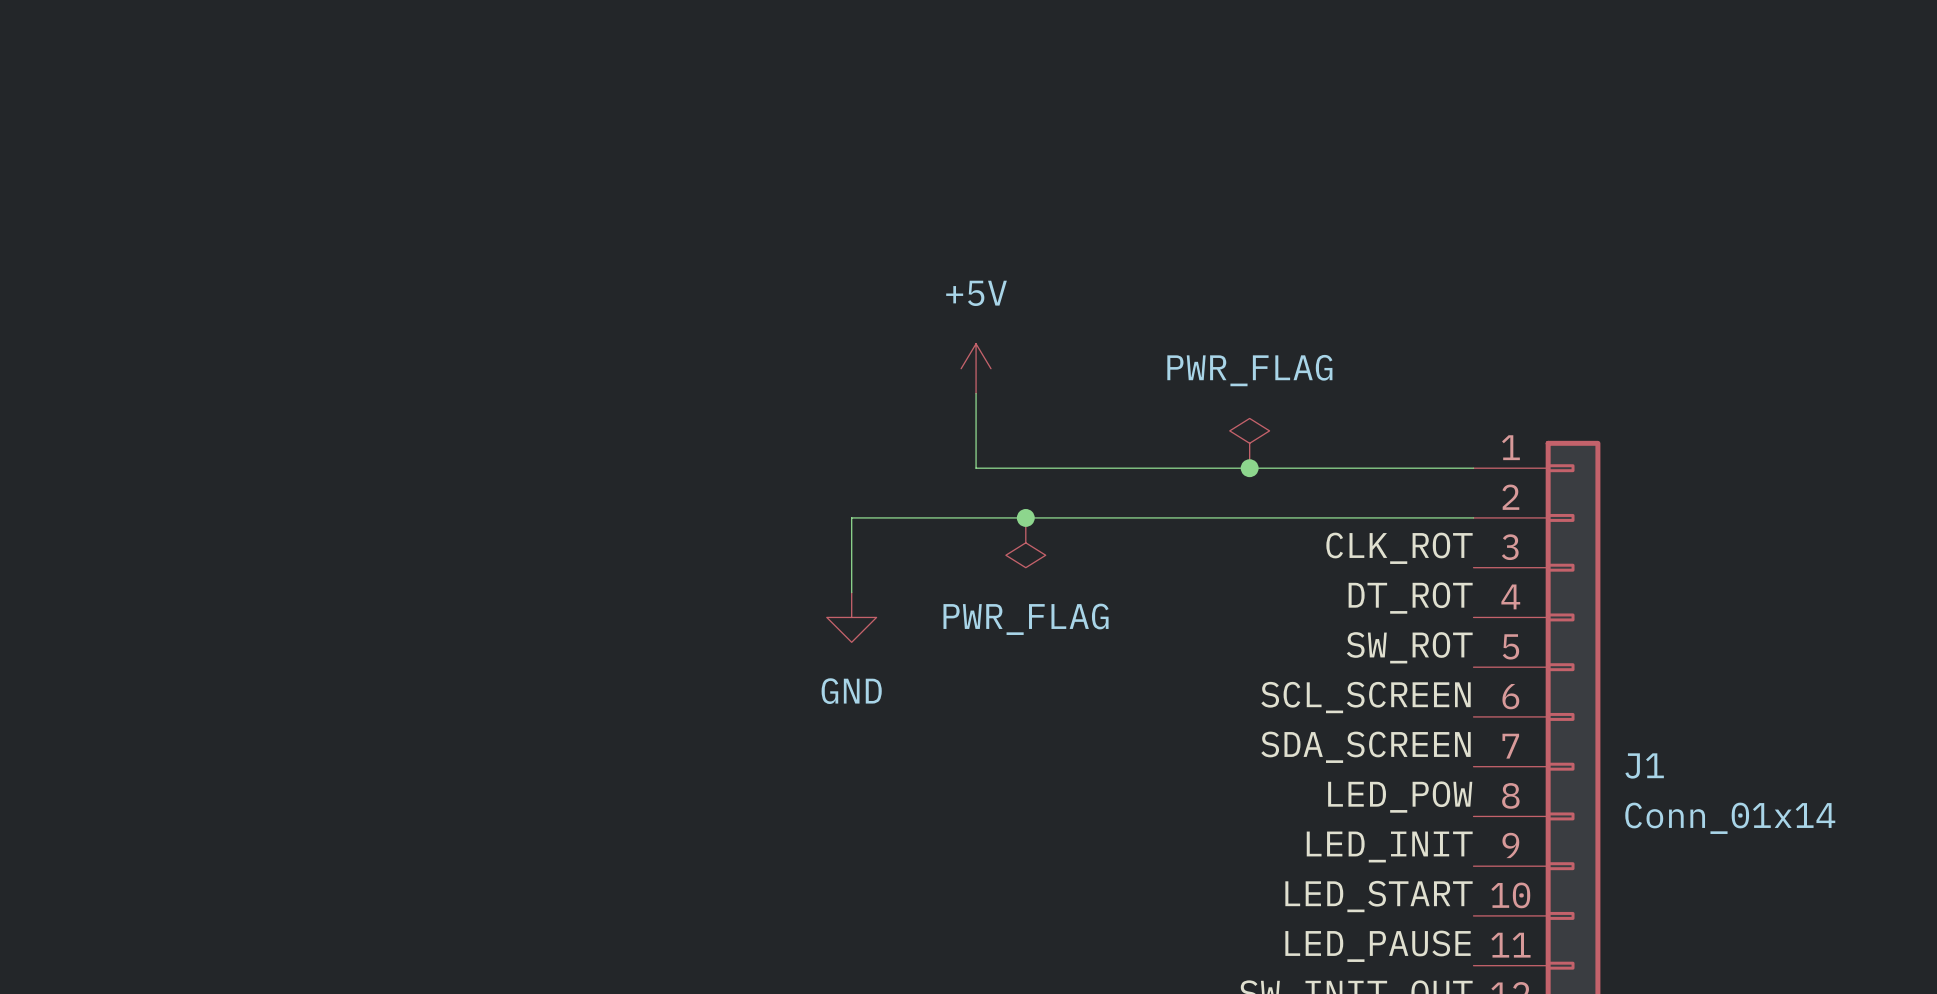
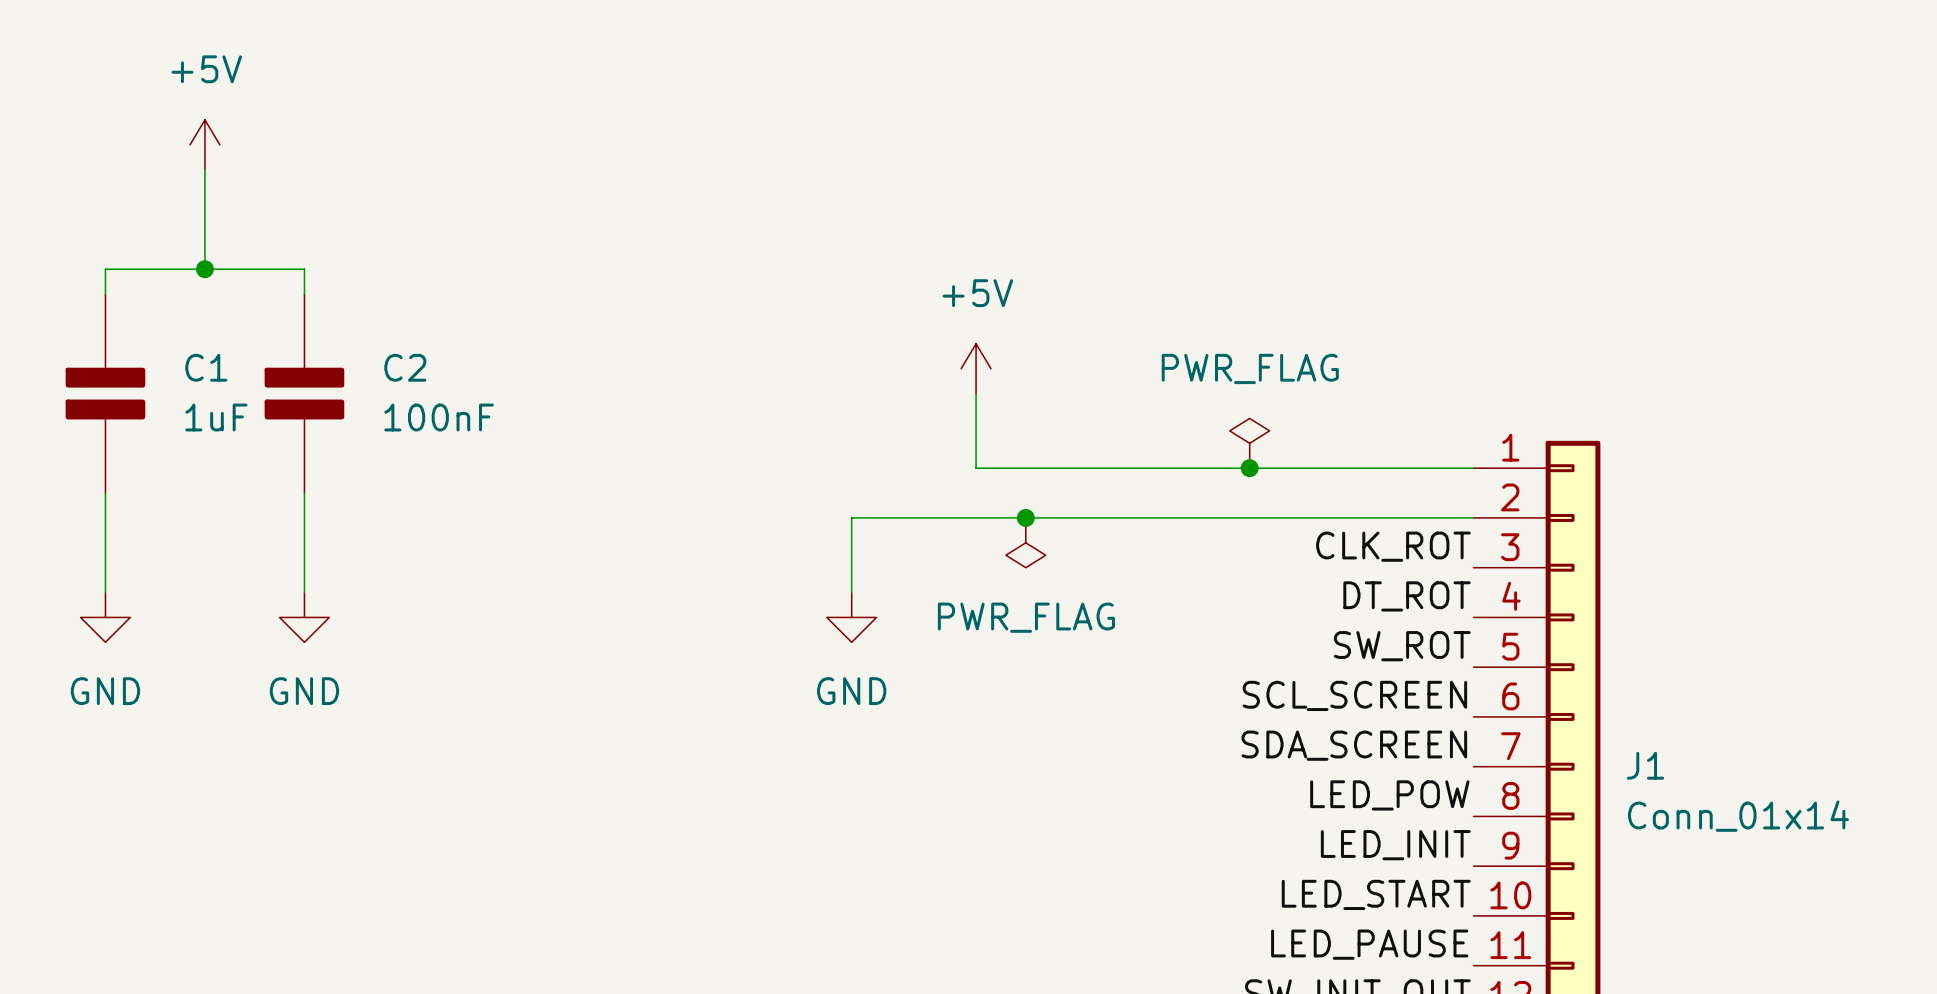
power symbol: none -> +5V (204, 144)
wire: none -> (204, 169) (204, 269)
junction: none -> (204, 269)
wire: none -> (105, 294) (105, 269) (304, 269) (304, 294)
C1: none -> 1uF (105, 393)
C2: none -> 100nF (304, 393)
wire: none -> (105, 493) (105, 592)
wire: none -> (304, 493) (304, 592)
power symbol: none -> GND (105, 617)
power symbol: none -> GND (304, 617)

